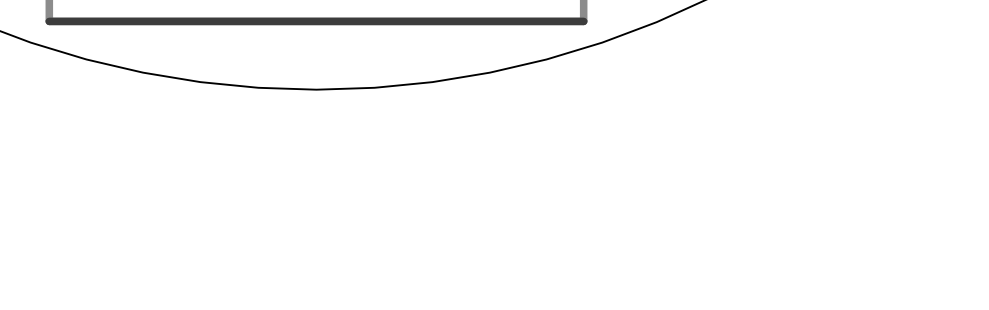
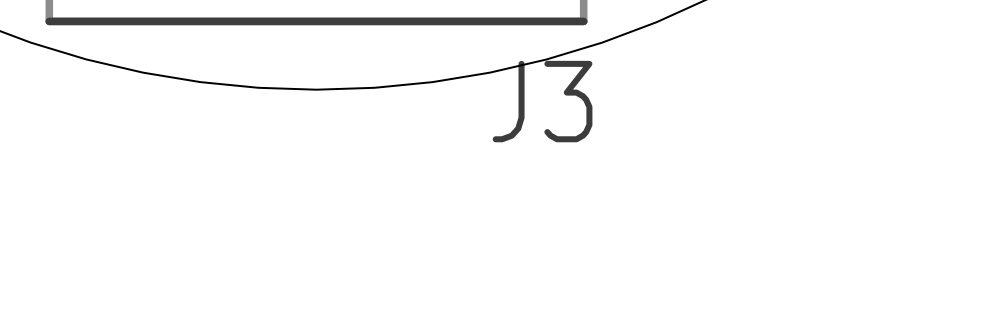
J3 name: none -> J3 (542, 101)

